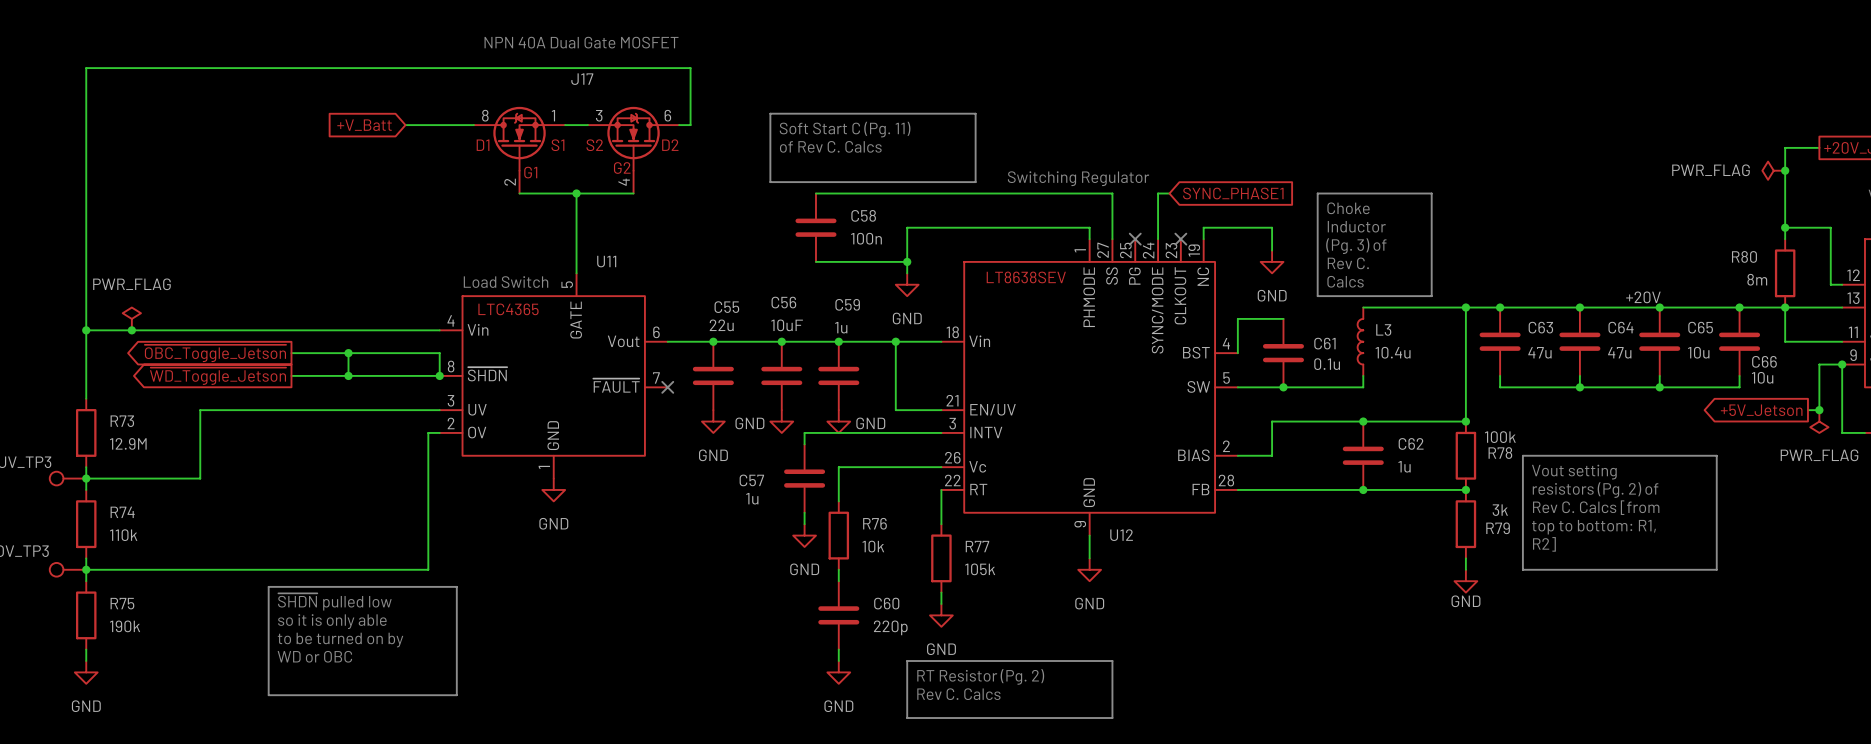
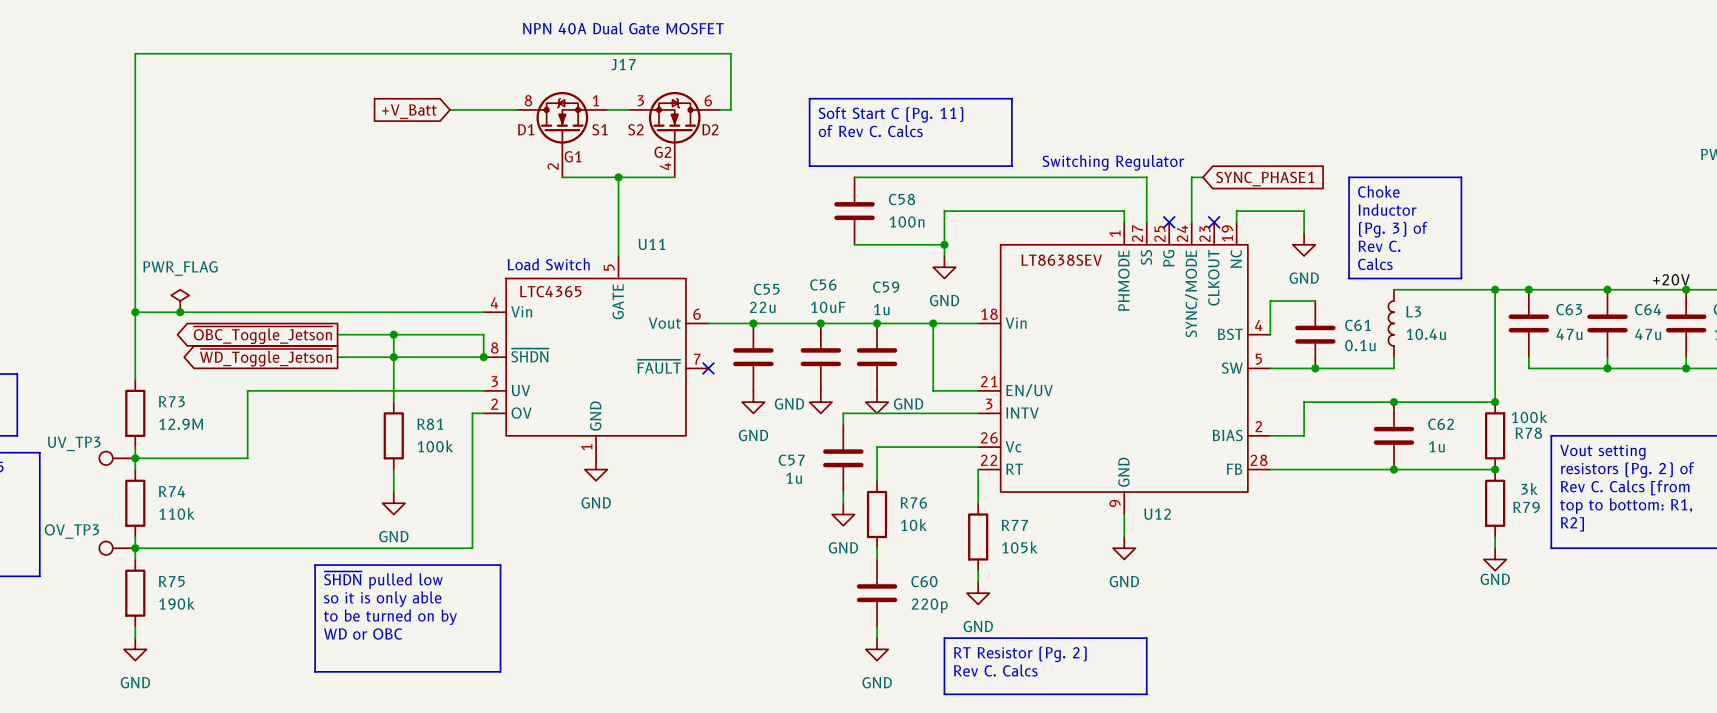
wire: none -> (393, 357) (393, 402)
R81: none -> 100k (393, 435)
wire: none -> (393, 469) (393, 492)
power symbol: none -> GND (393, 503)

